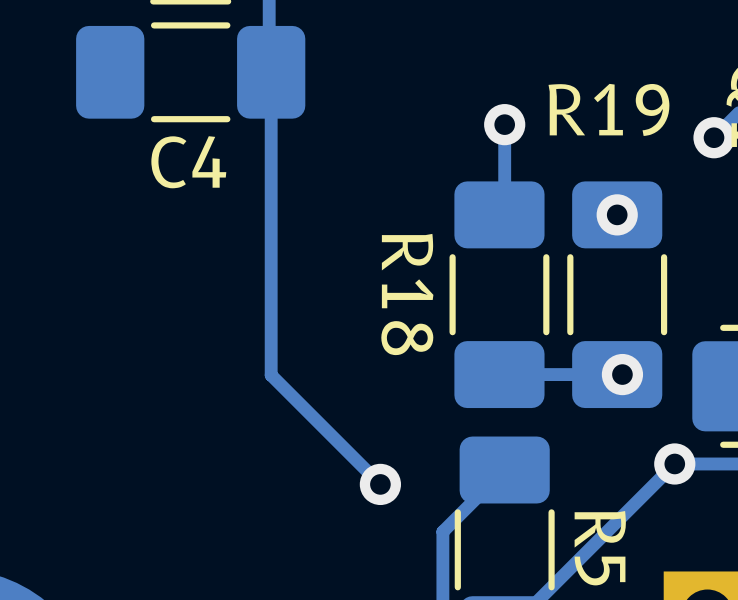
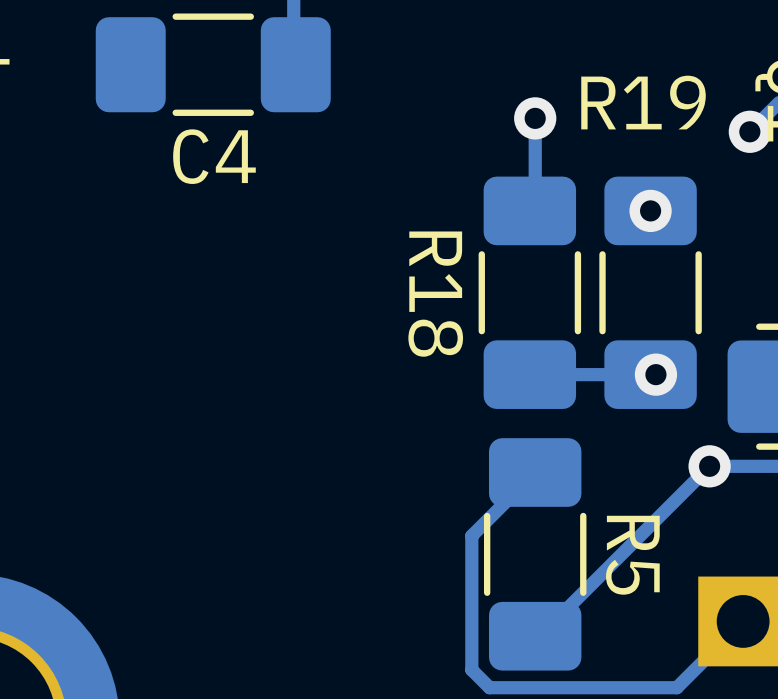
track: (271, 72) (271, 375) (380, 484) -> none
via: (380, 484) -> none

